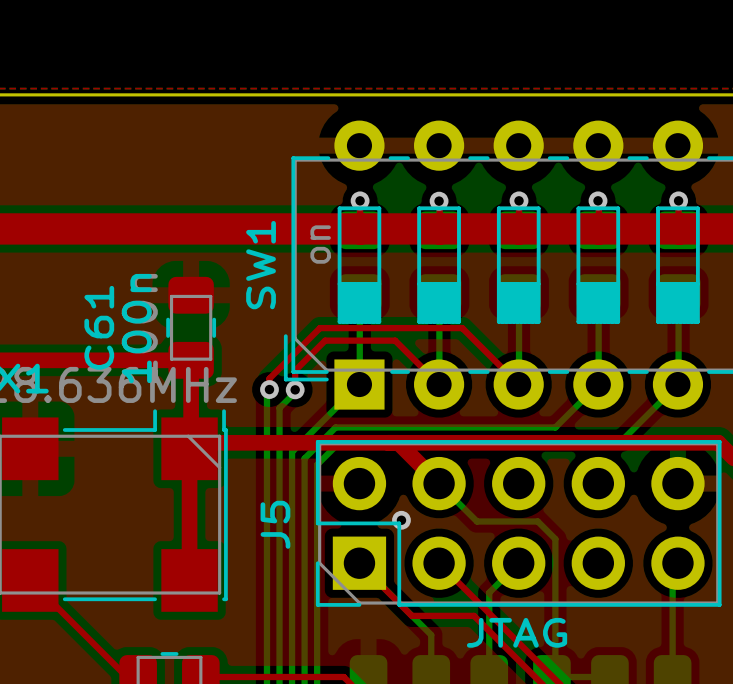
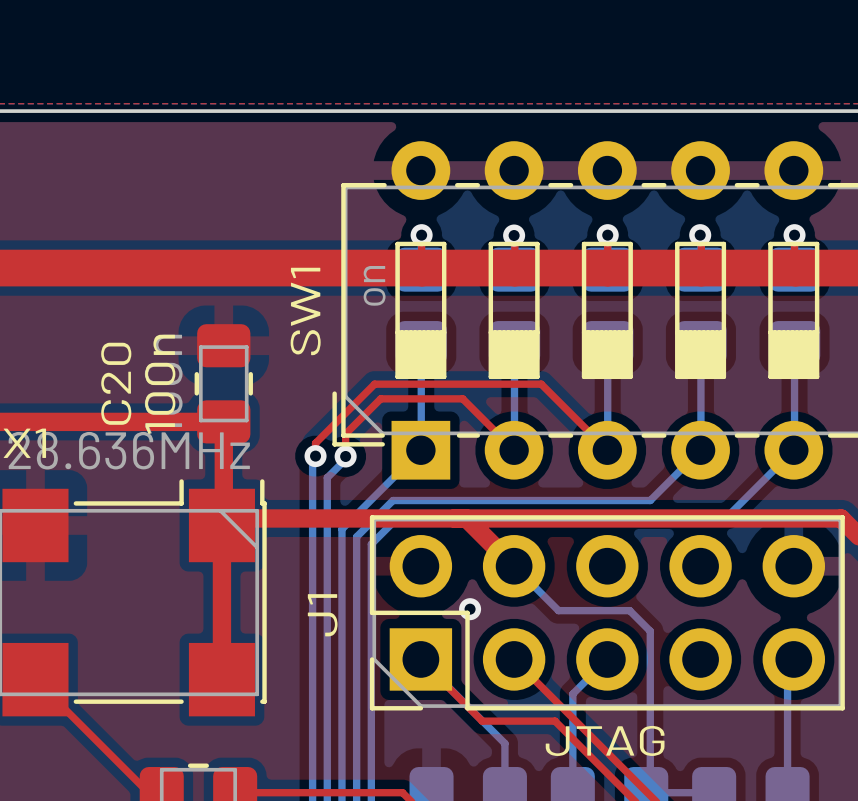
C61 name: C61 (99, 327) -> C20 (116, 383)
J5 name: J5 (275, 524) -> J1 (322, 615)

